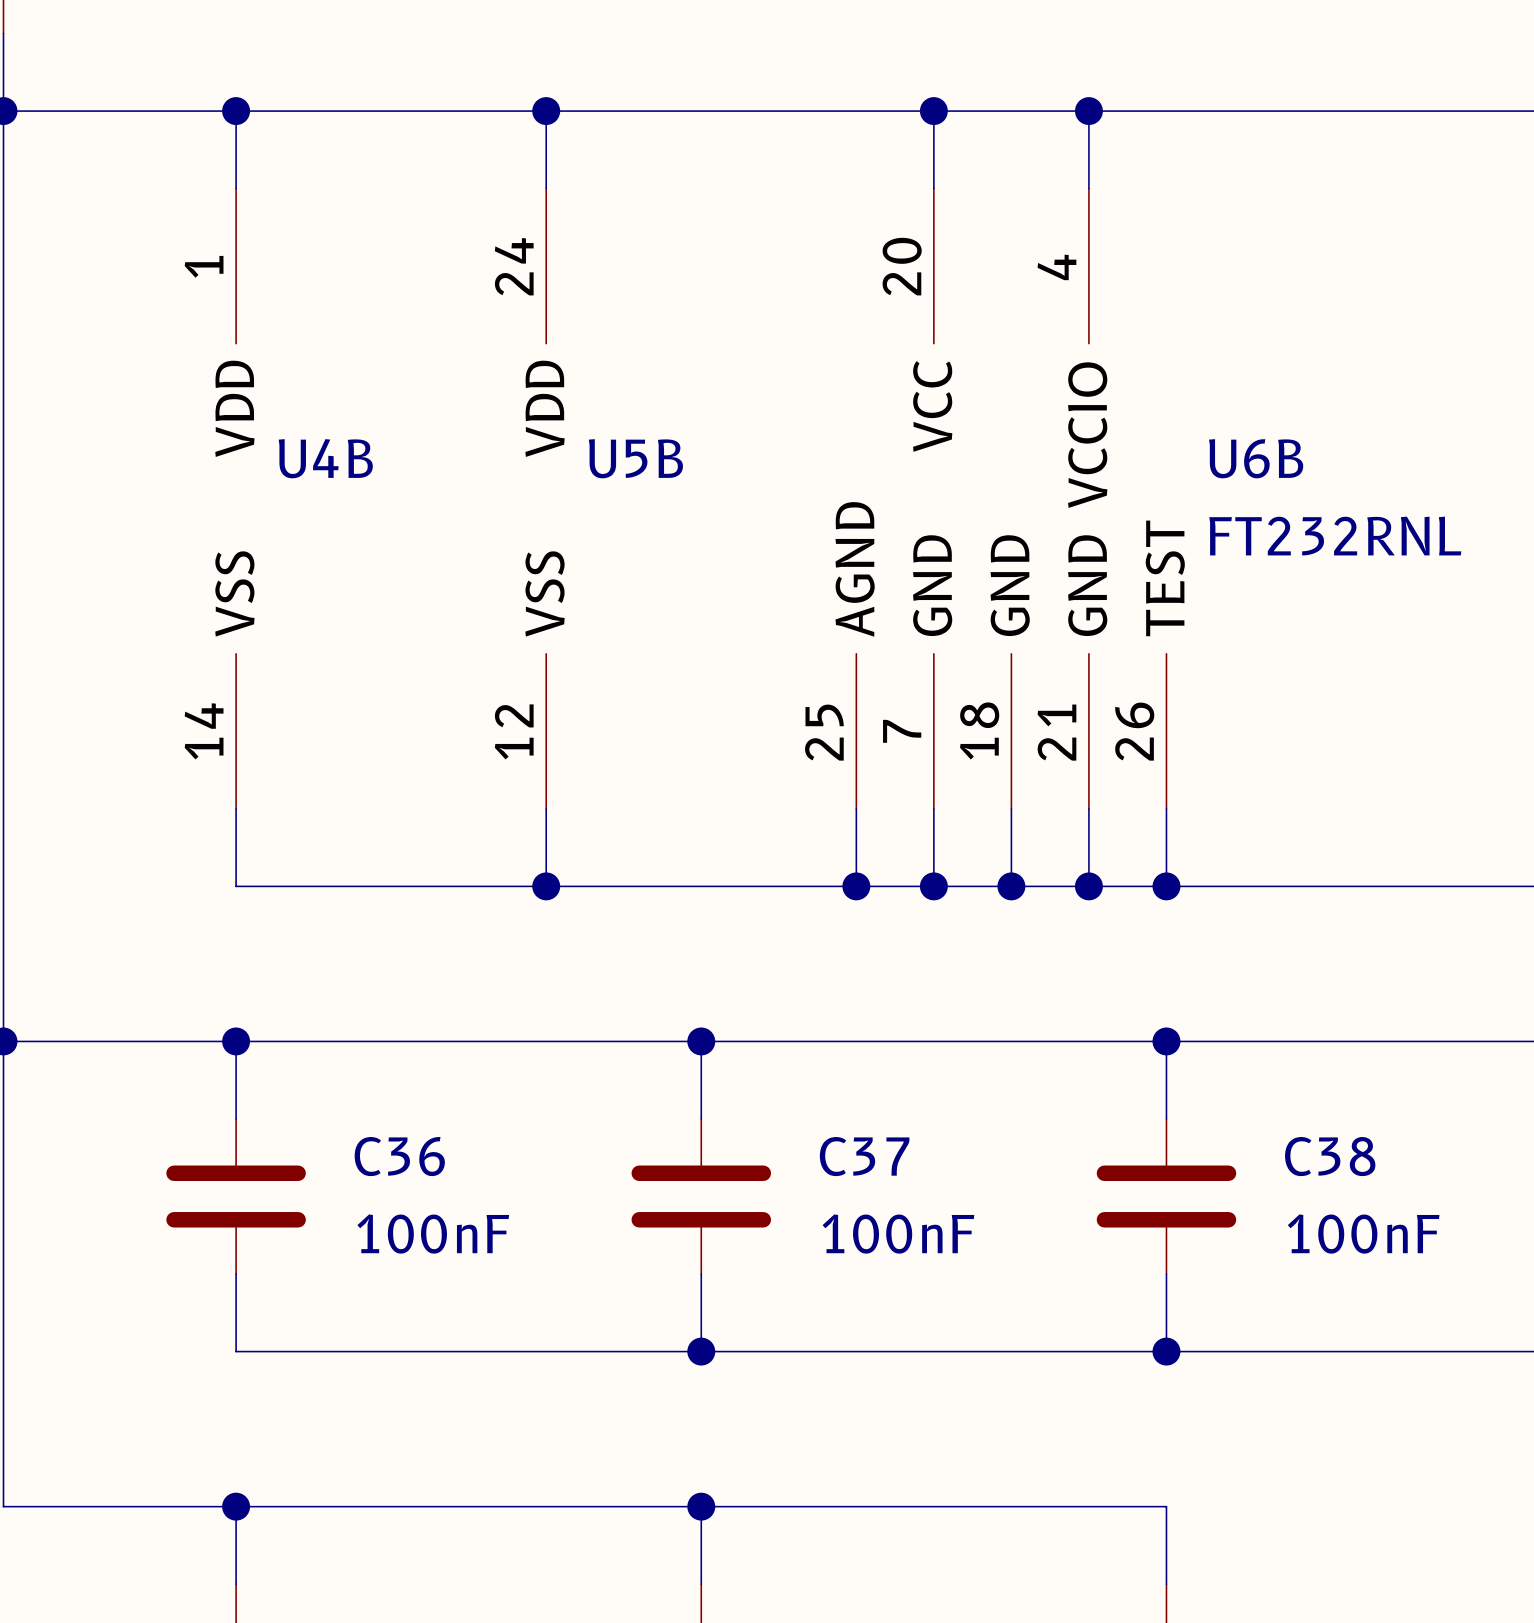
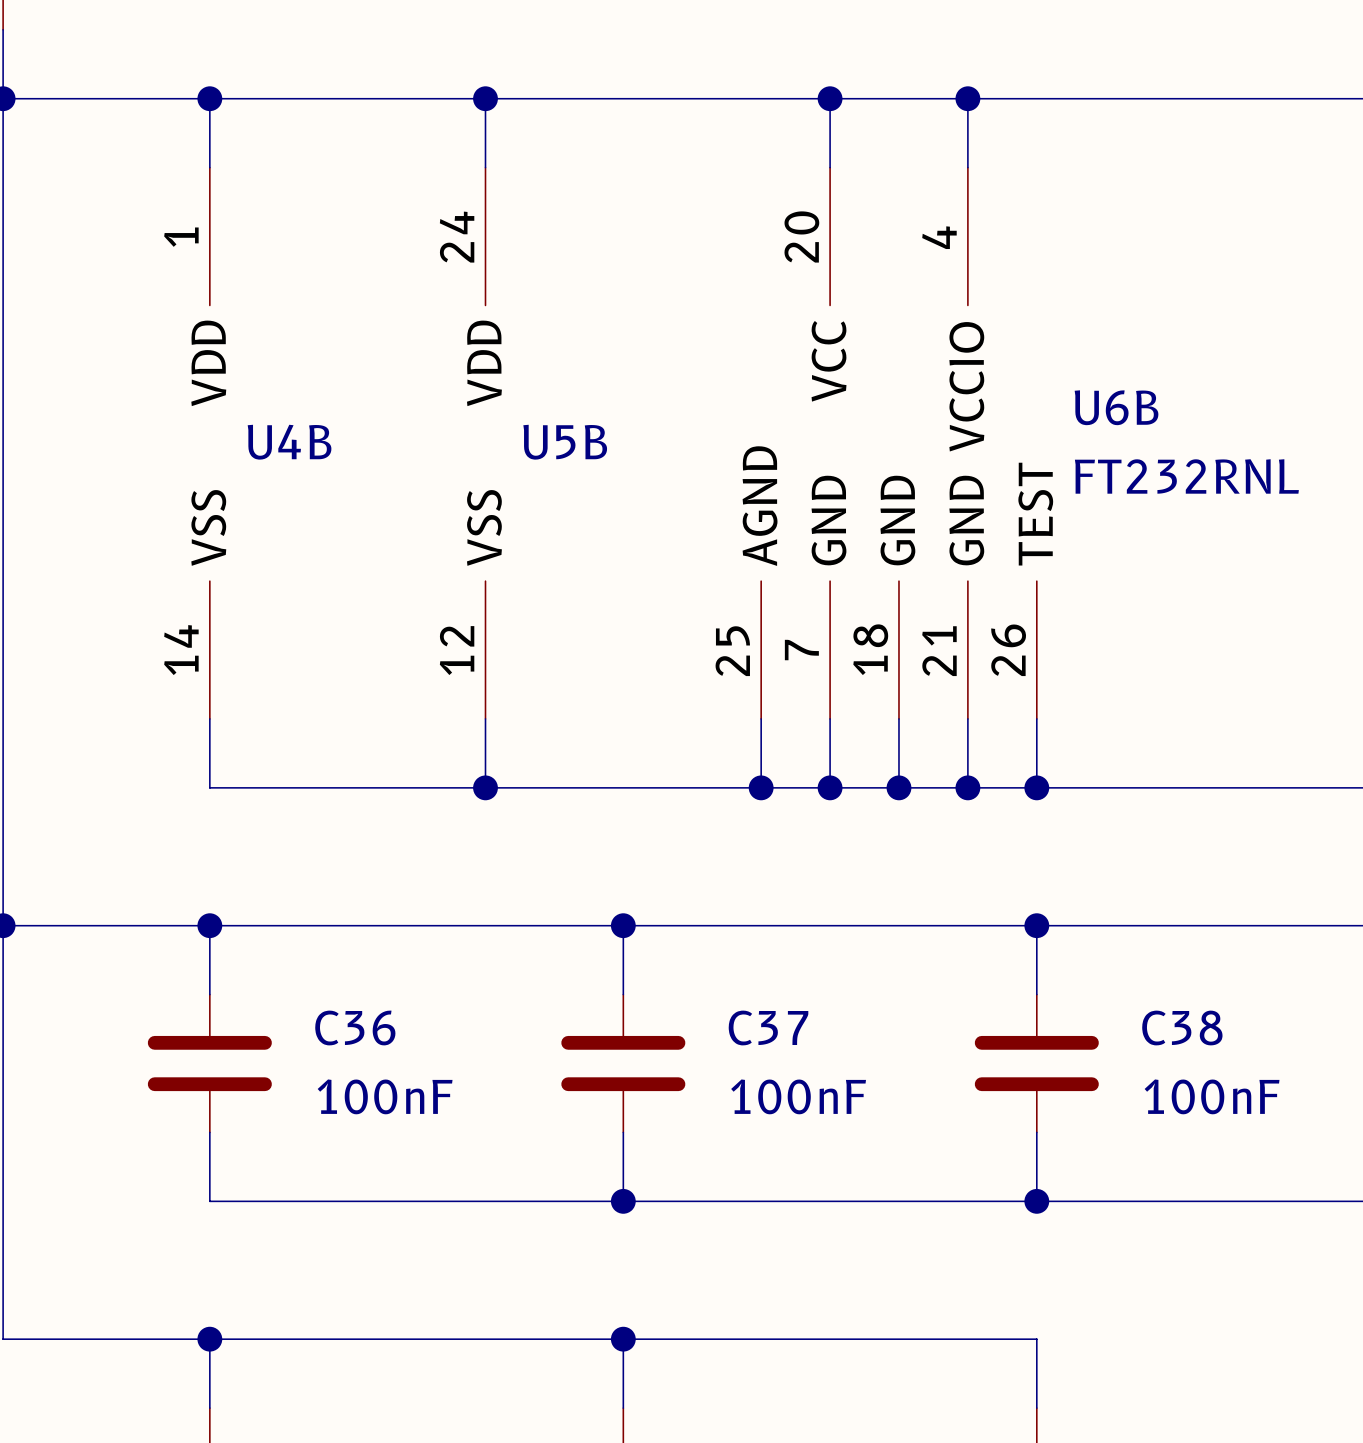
U4B name position: U4B (325, 458) -> U4B (289, 442)
U5B name position: U5B (635, 458) -> U5B (565, 442)

